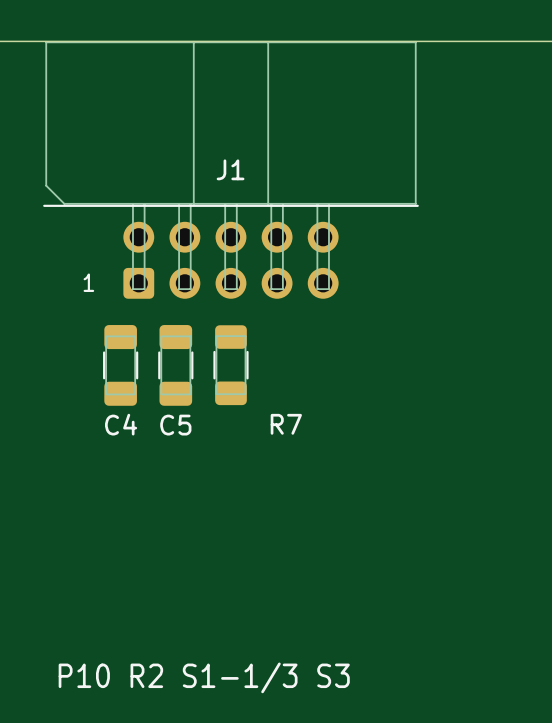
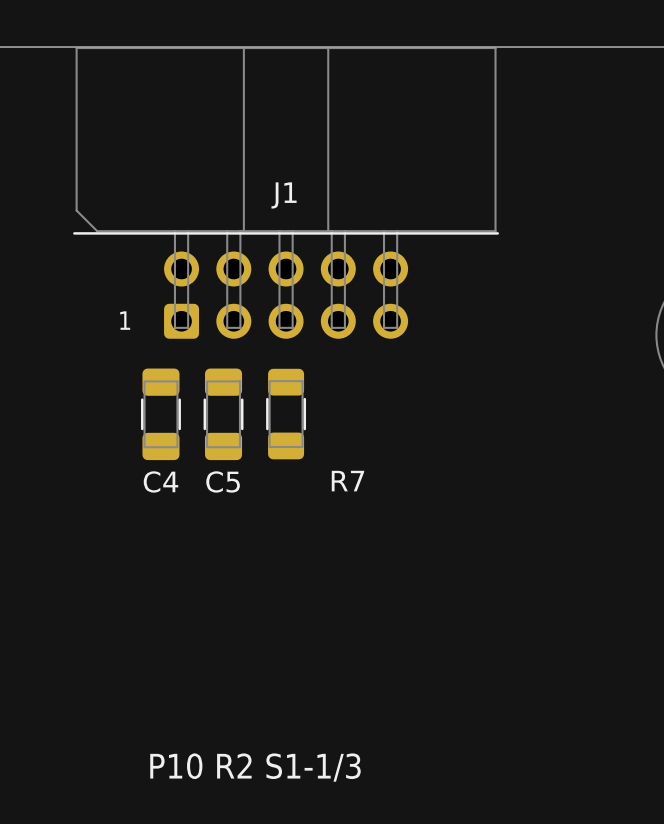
text: P10 R2 S1-1/3 S3 (204, 677) -> P10 R2 S1-1/3 (255, 767)

